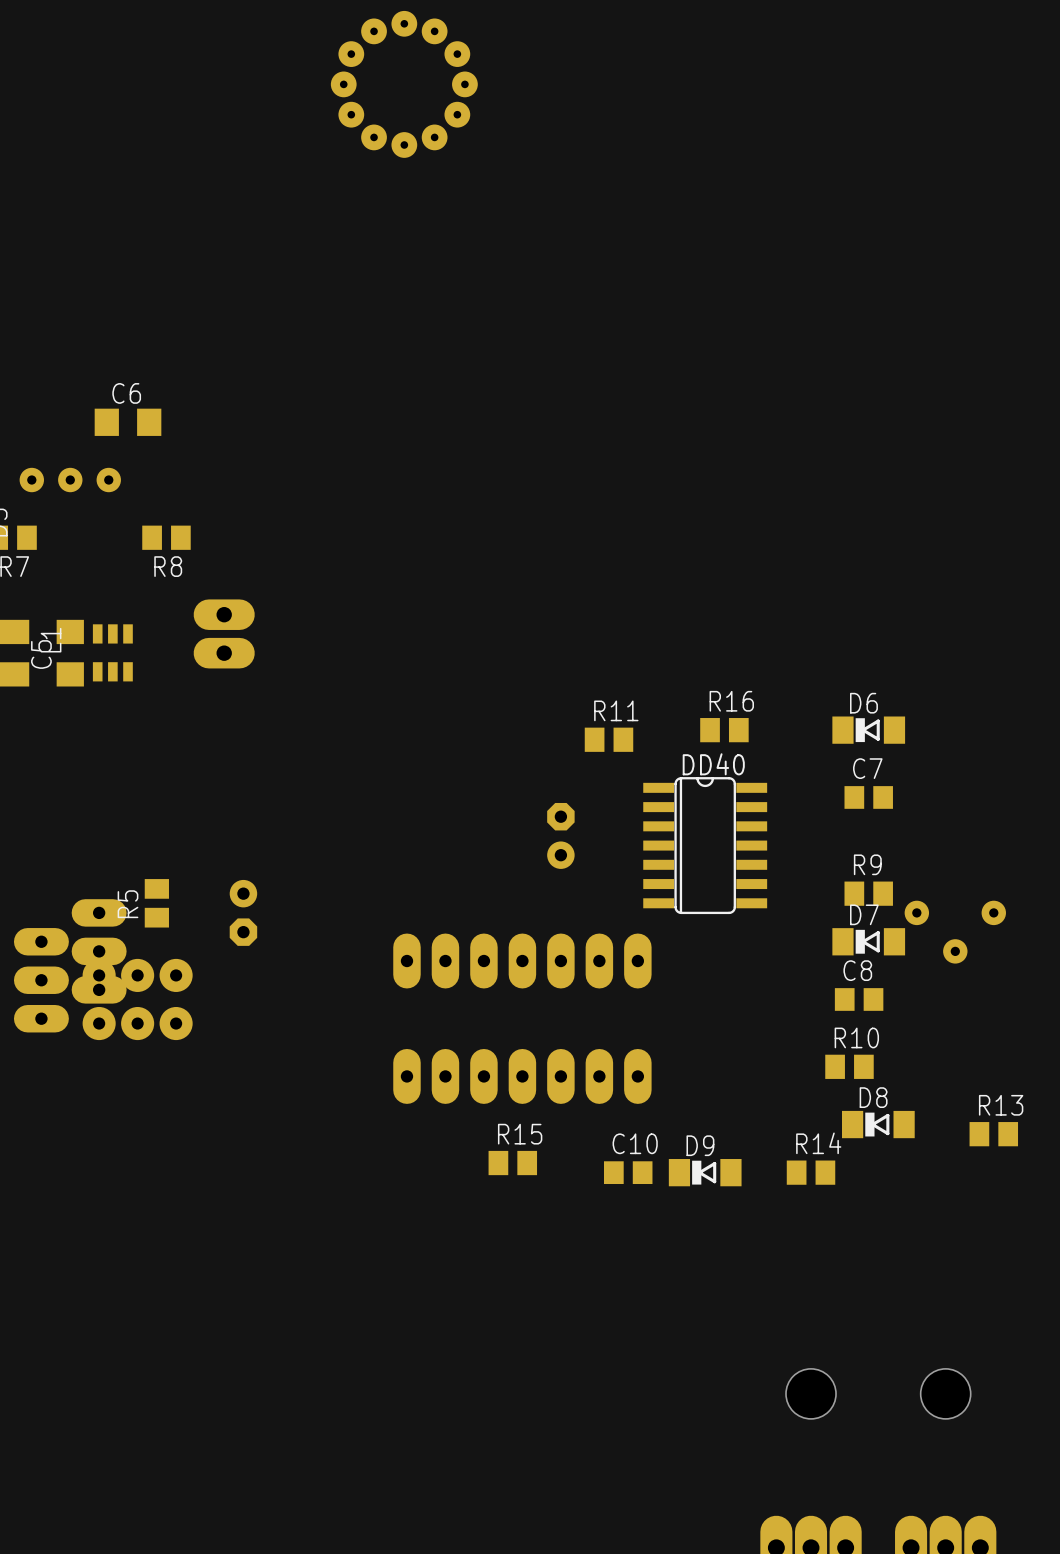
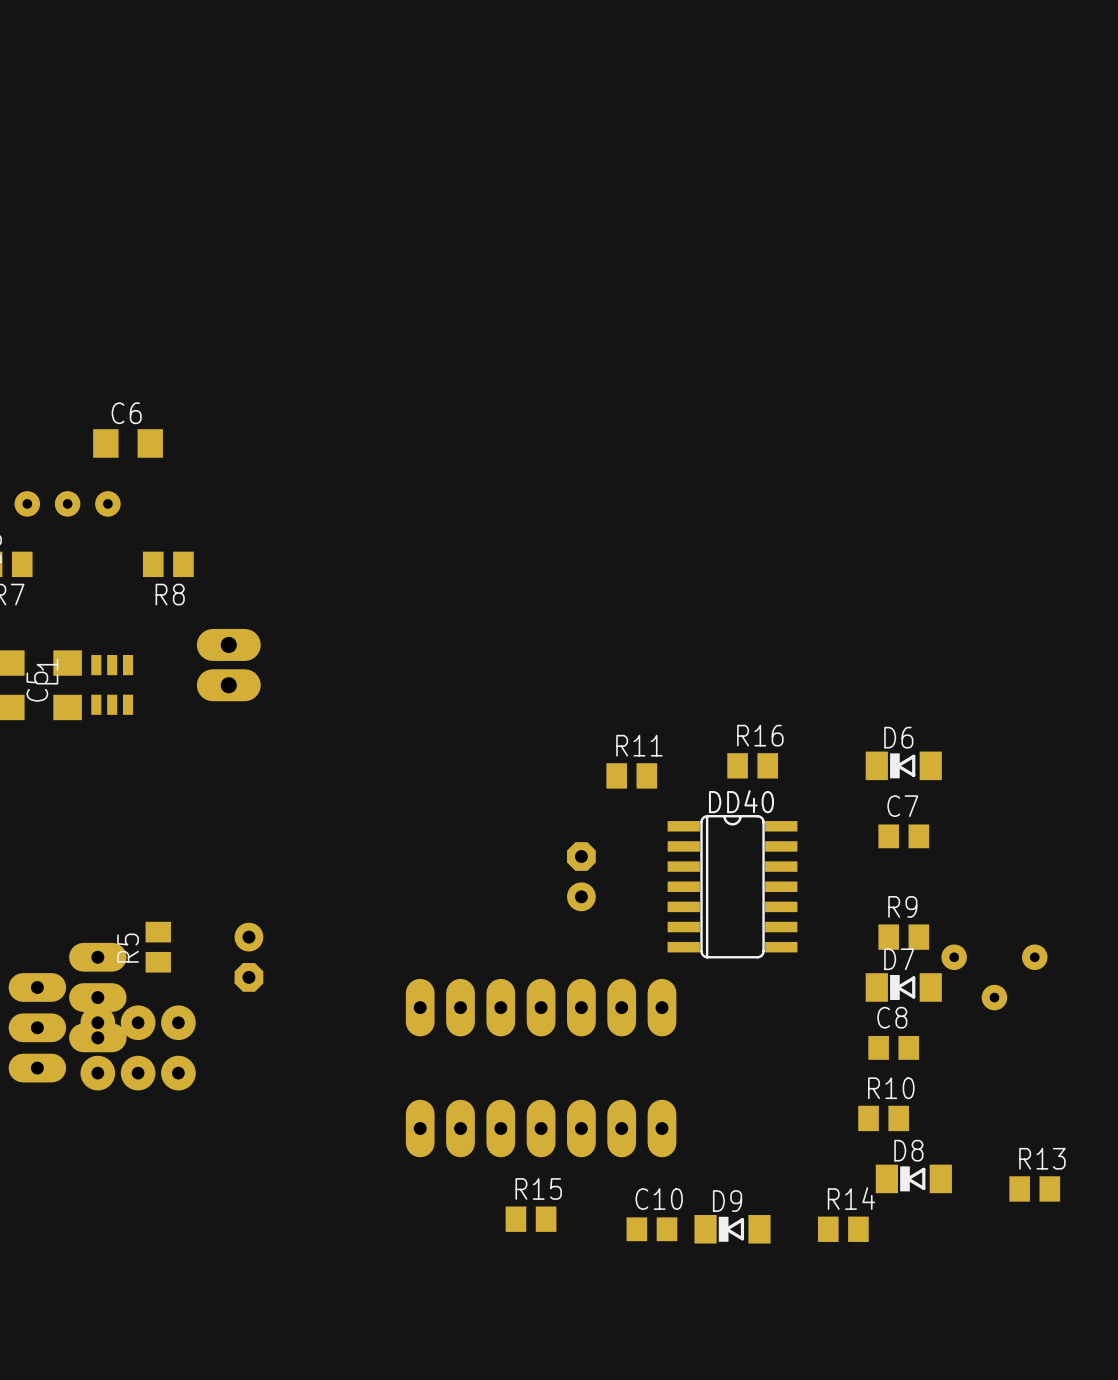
part: (404, 84) -> none

